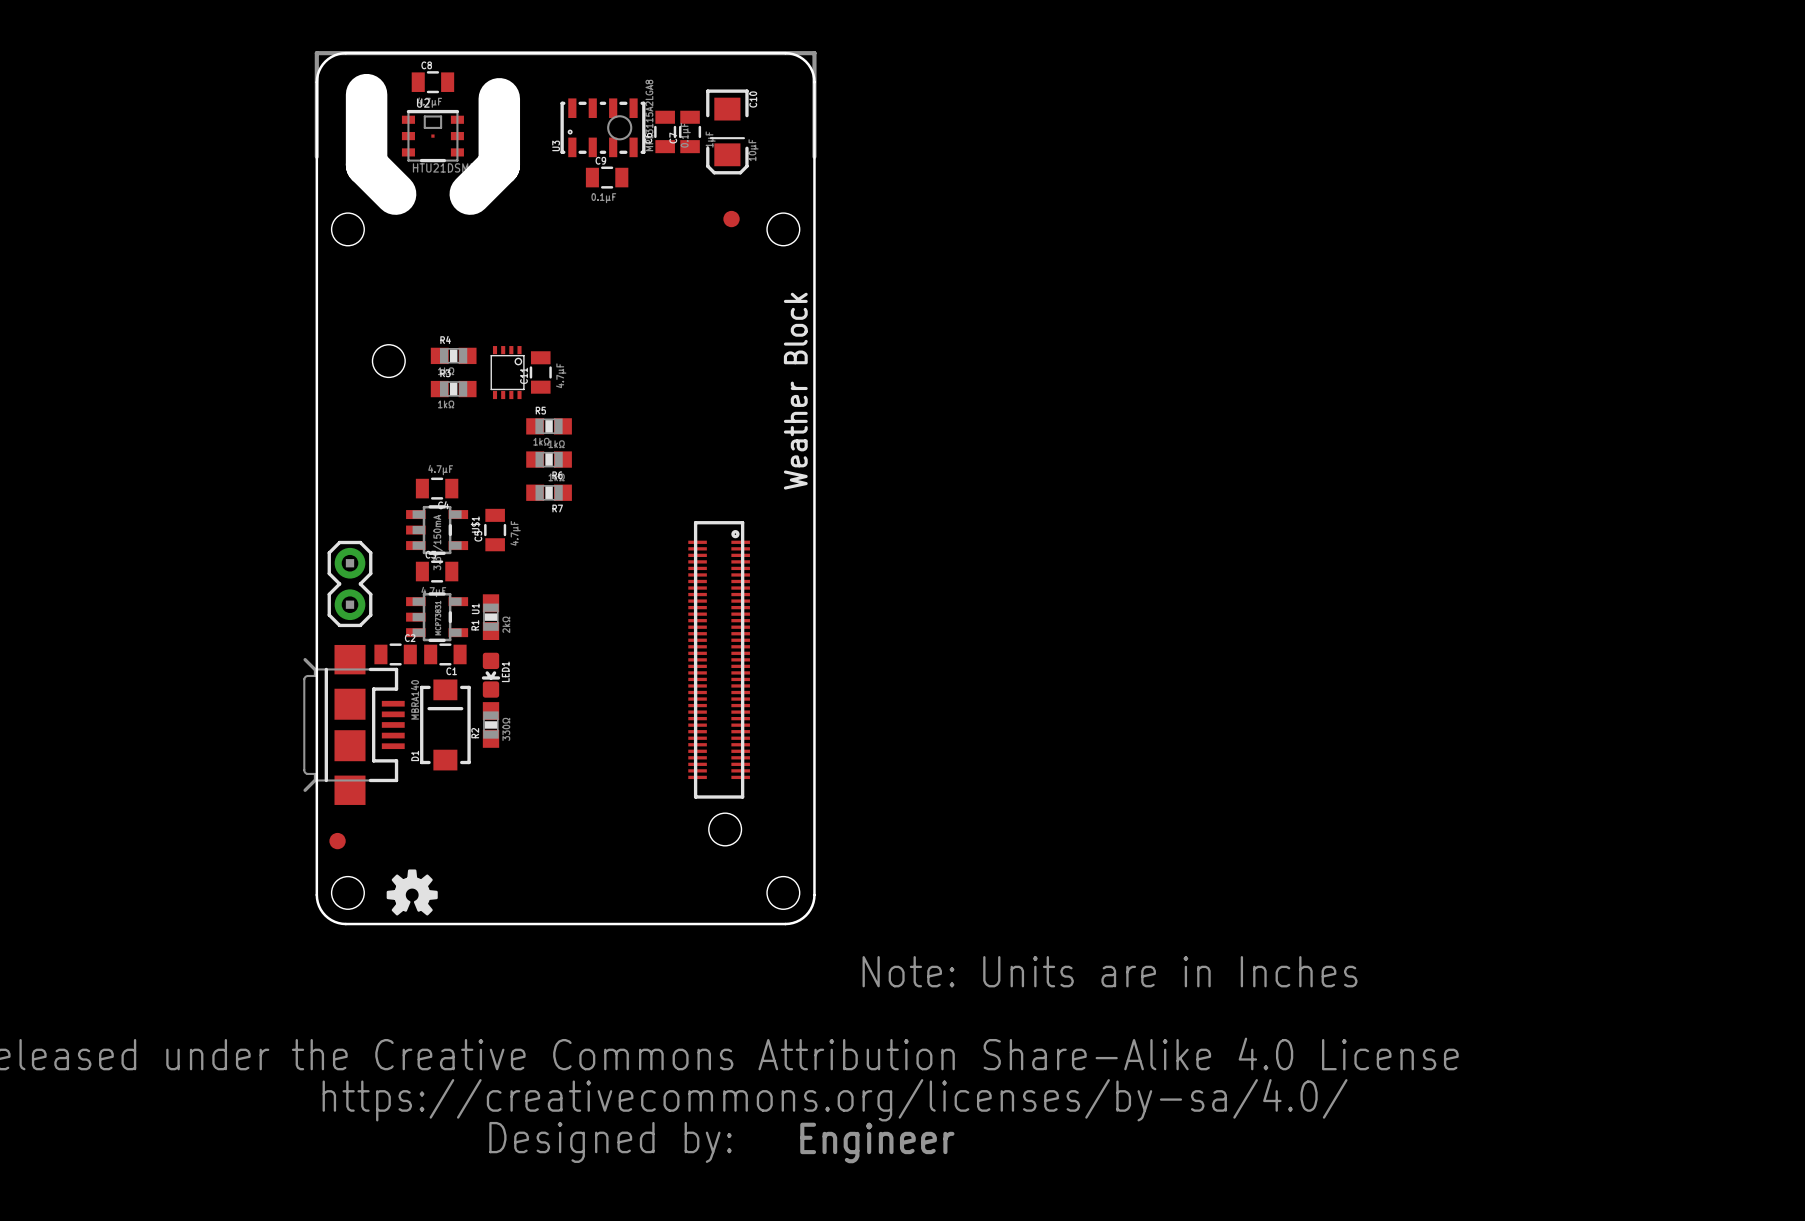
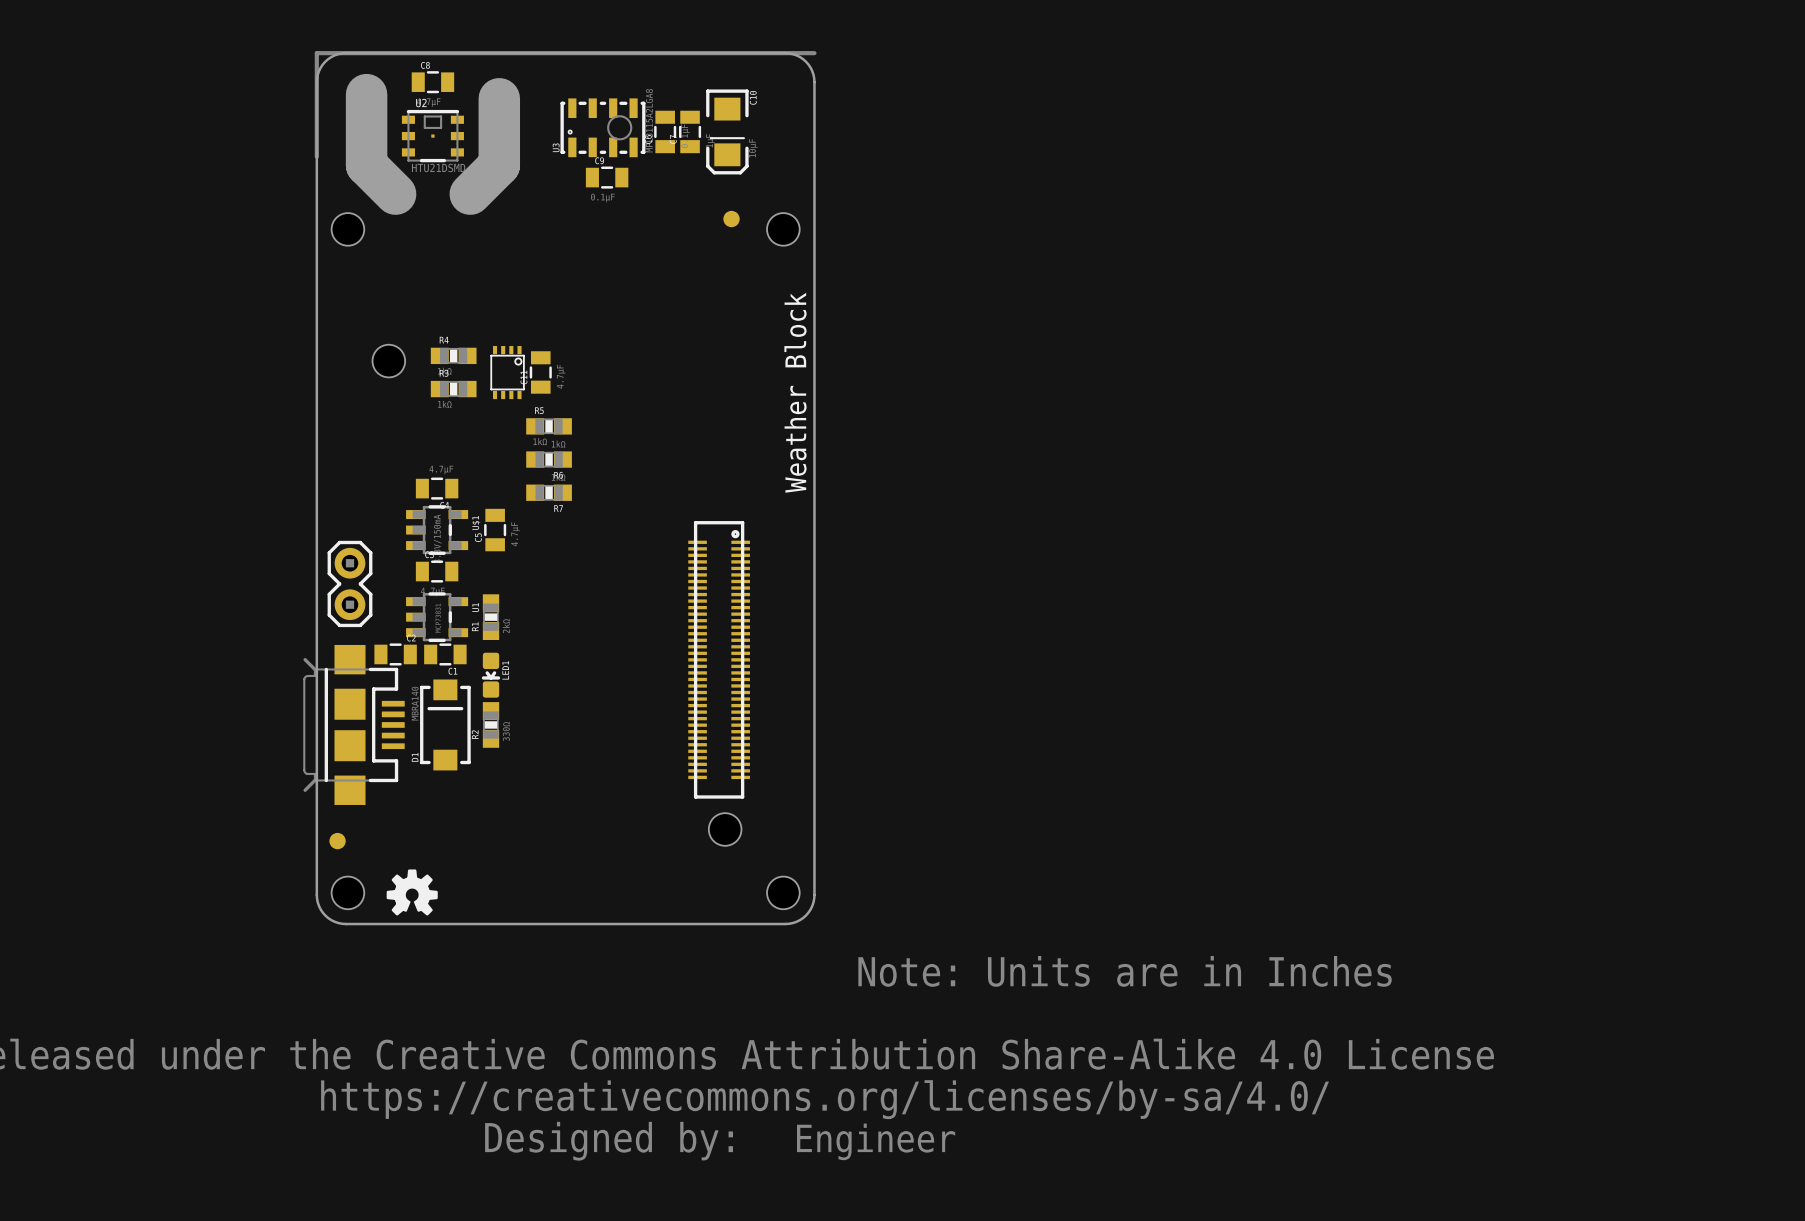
line: (814, 53) (814, 156) -> none

